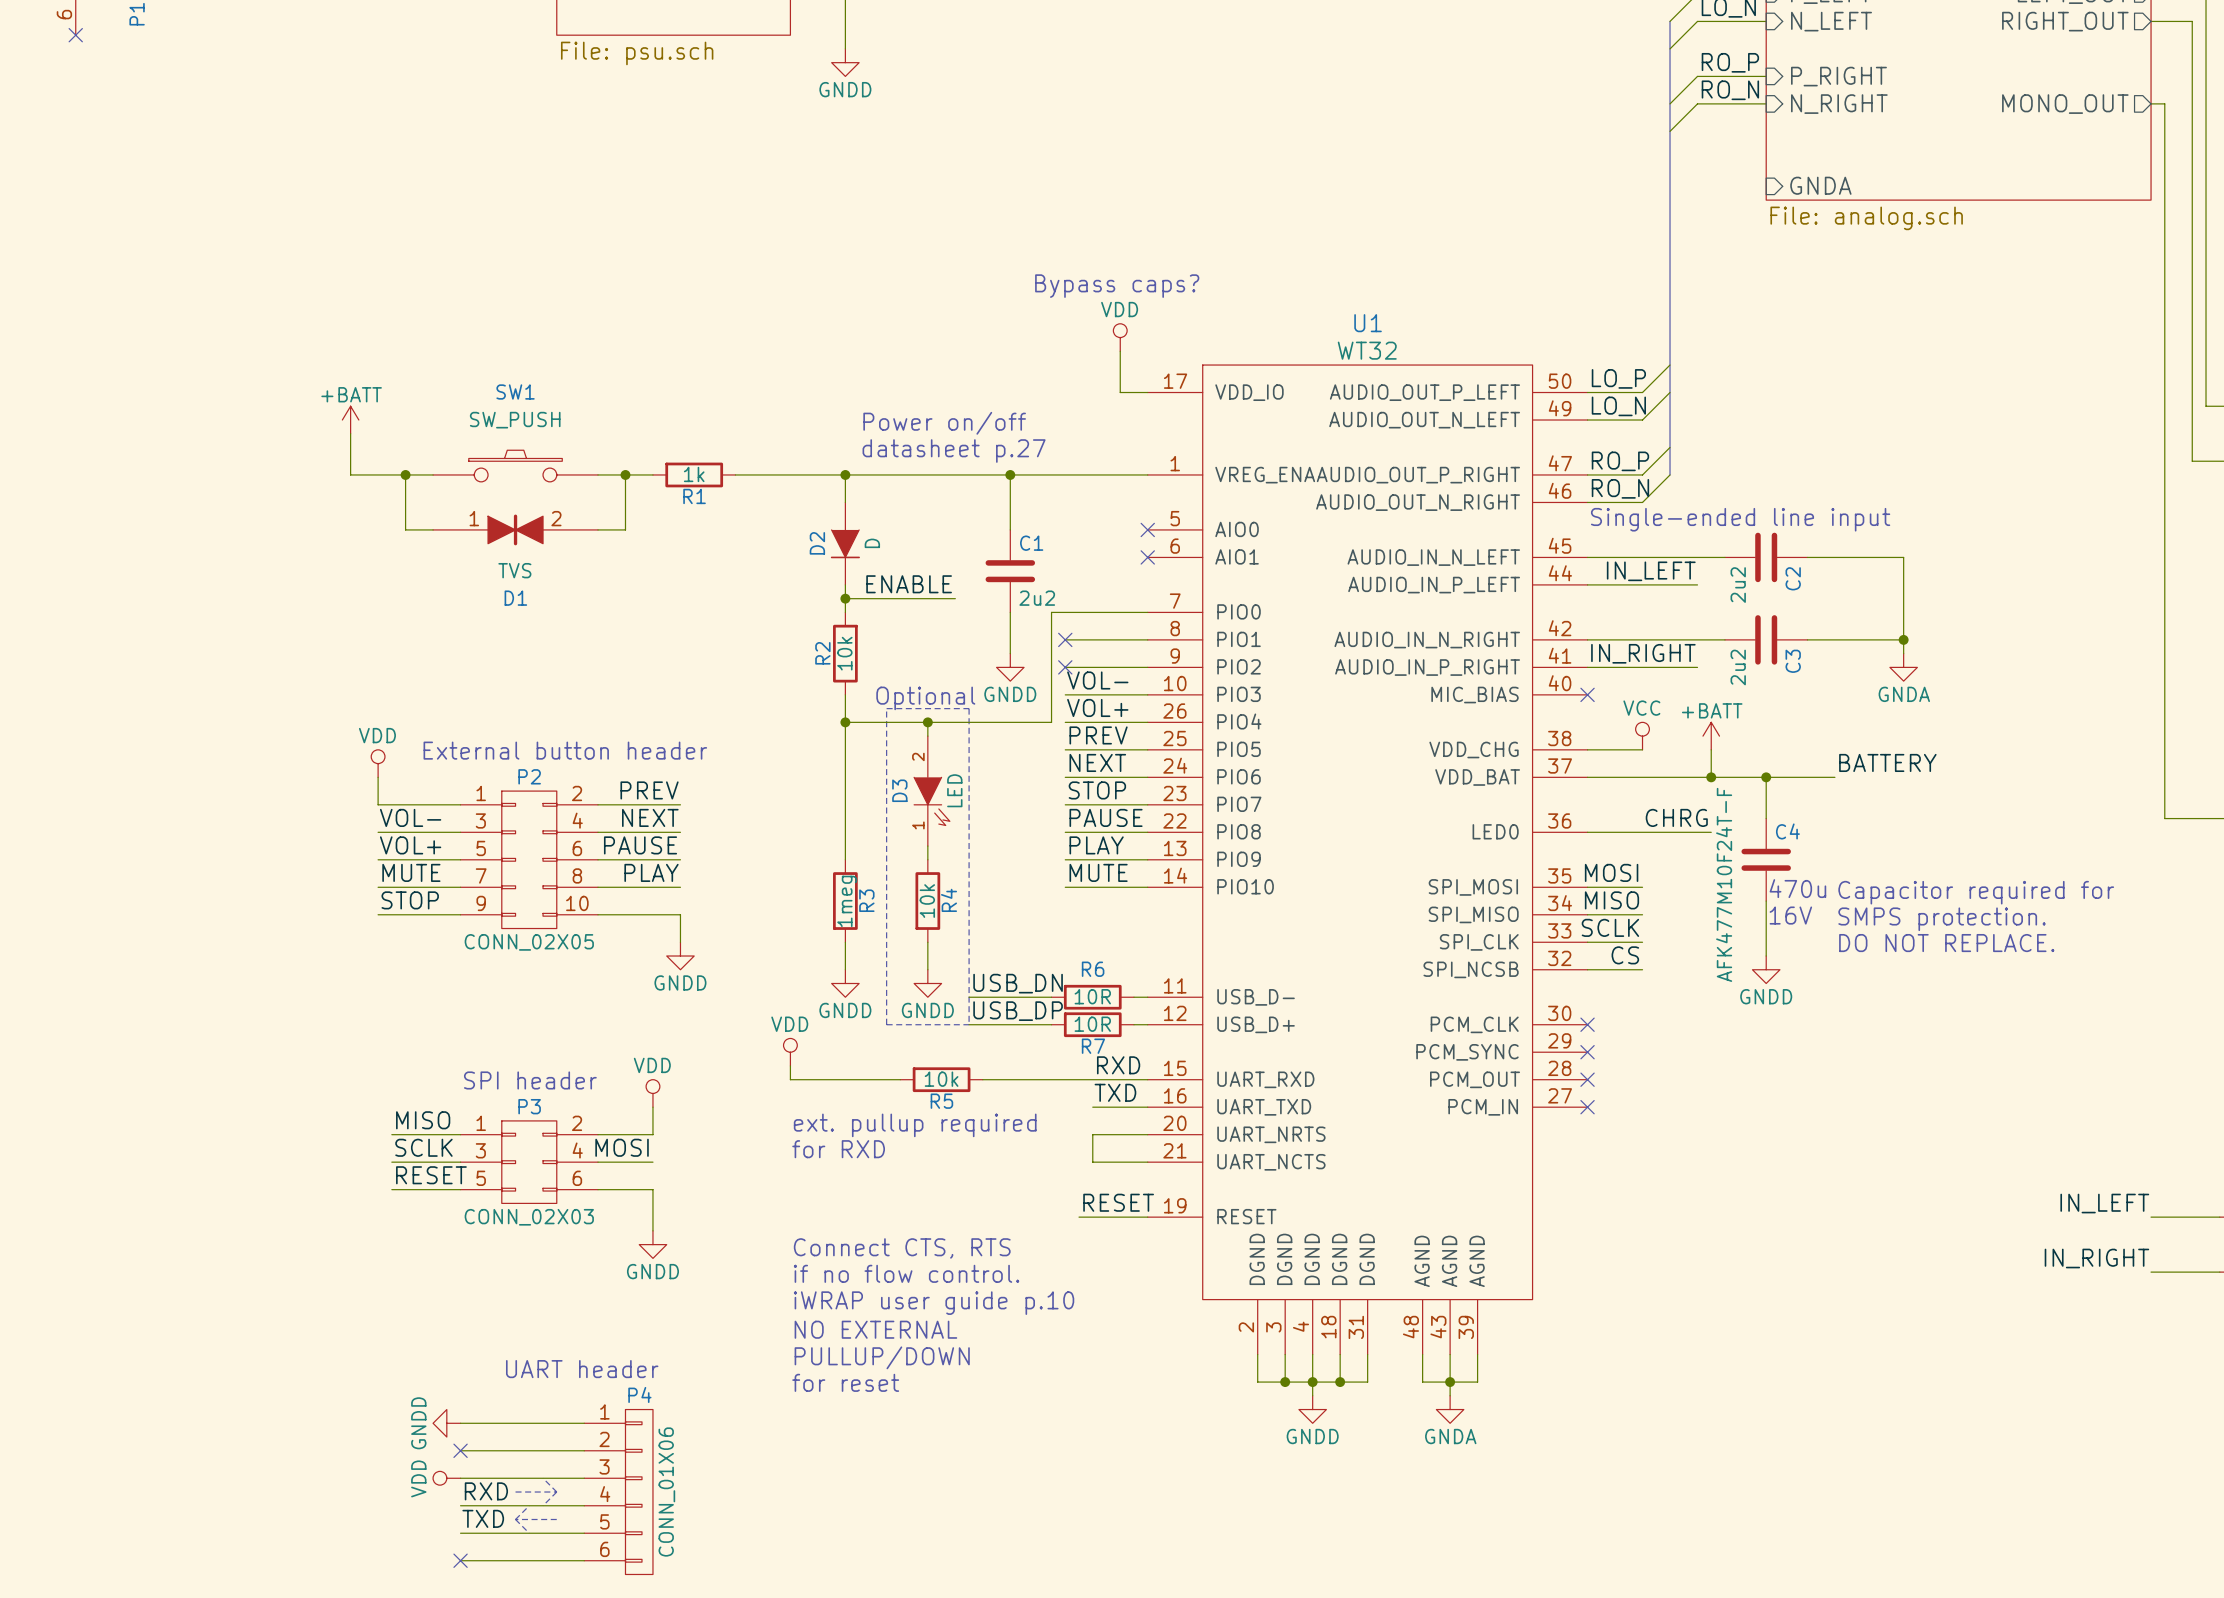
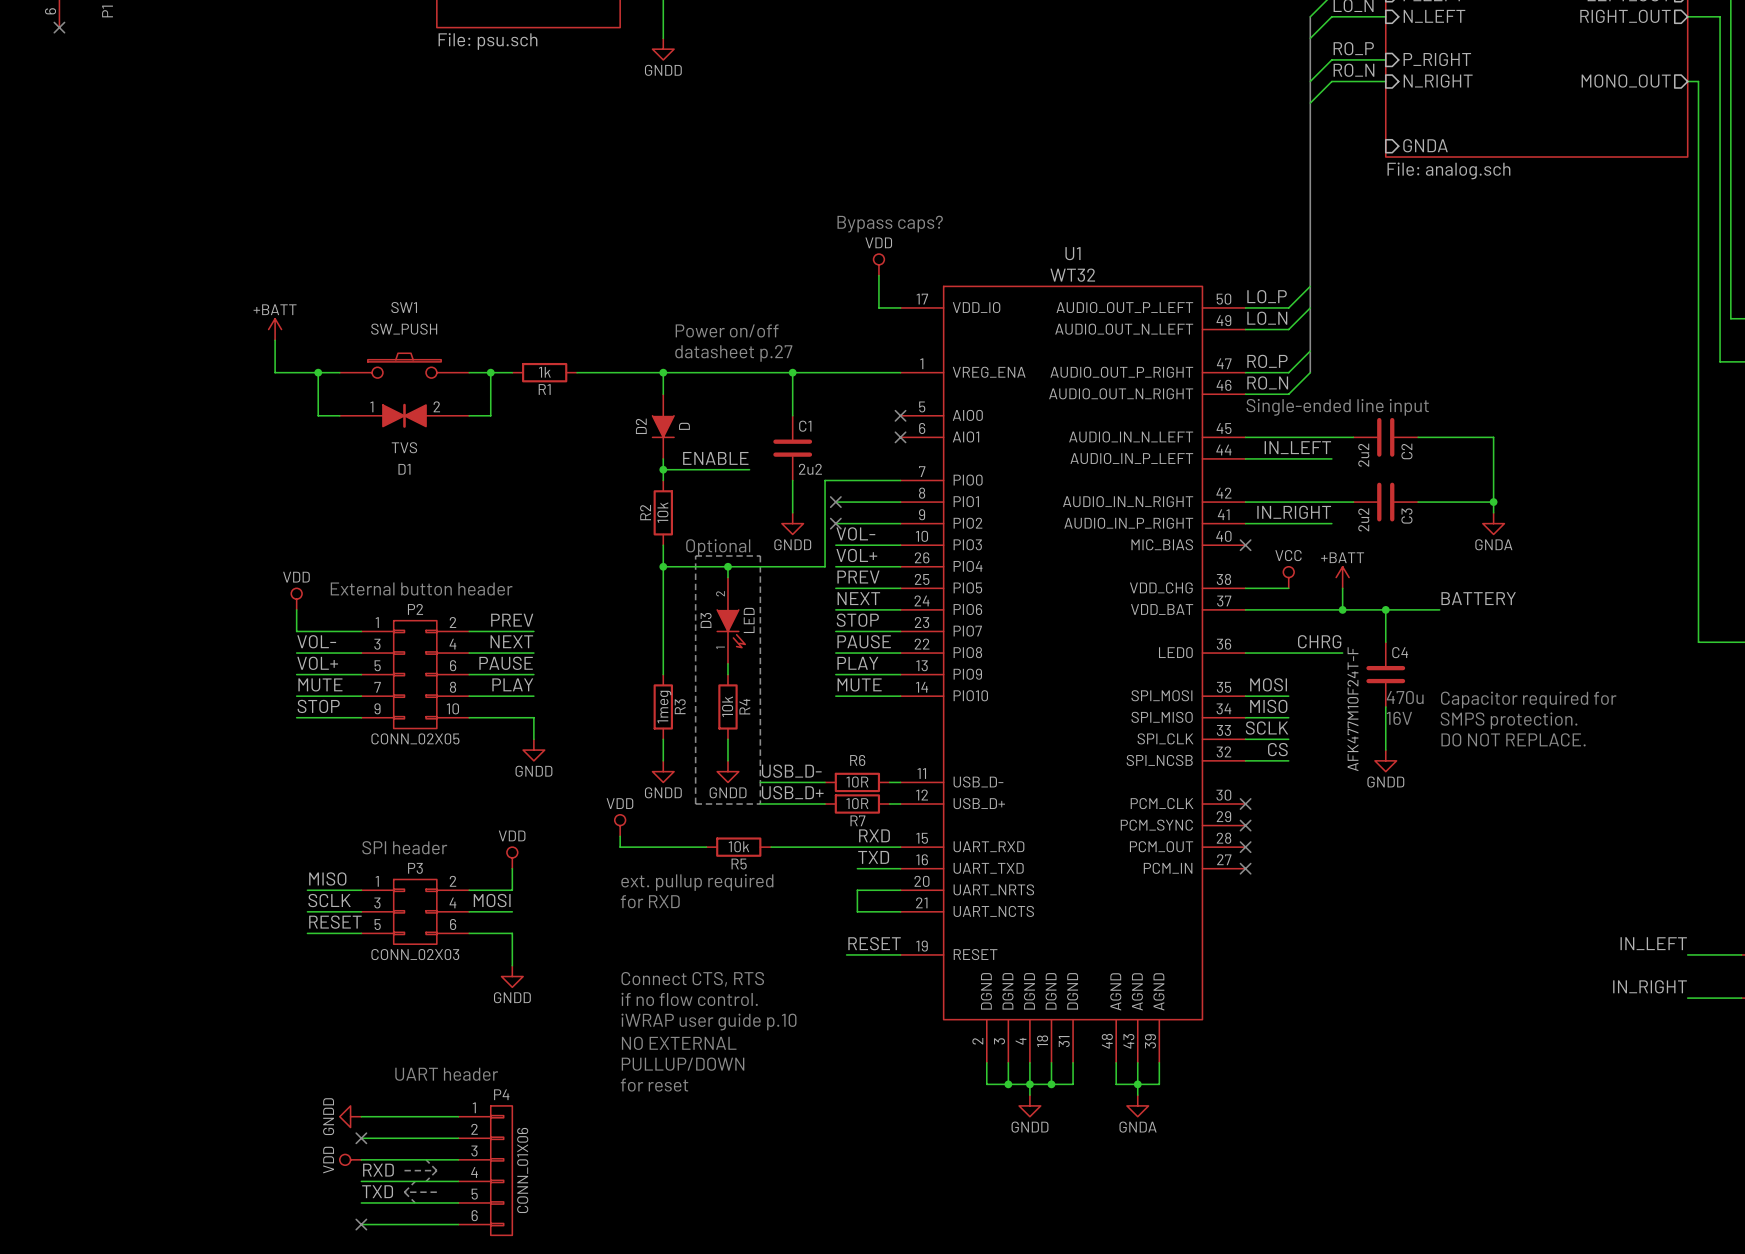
label: USB_DN (1018, 983) -> USB_D- (791, 771)
label: USB_DP (1018, 1011) -> USB_D+ (792, 792)

